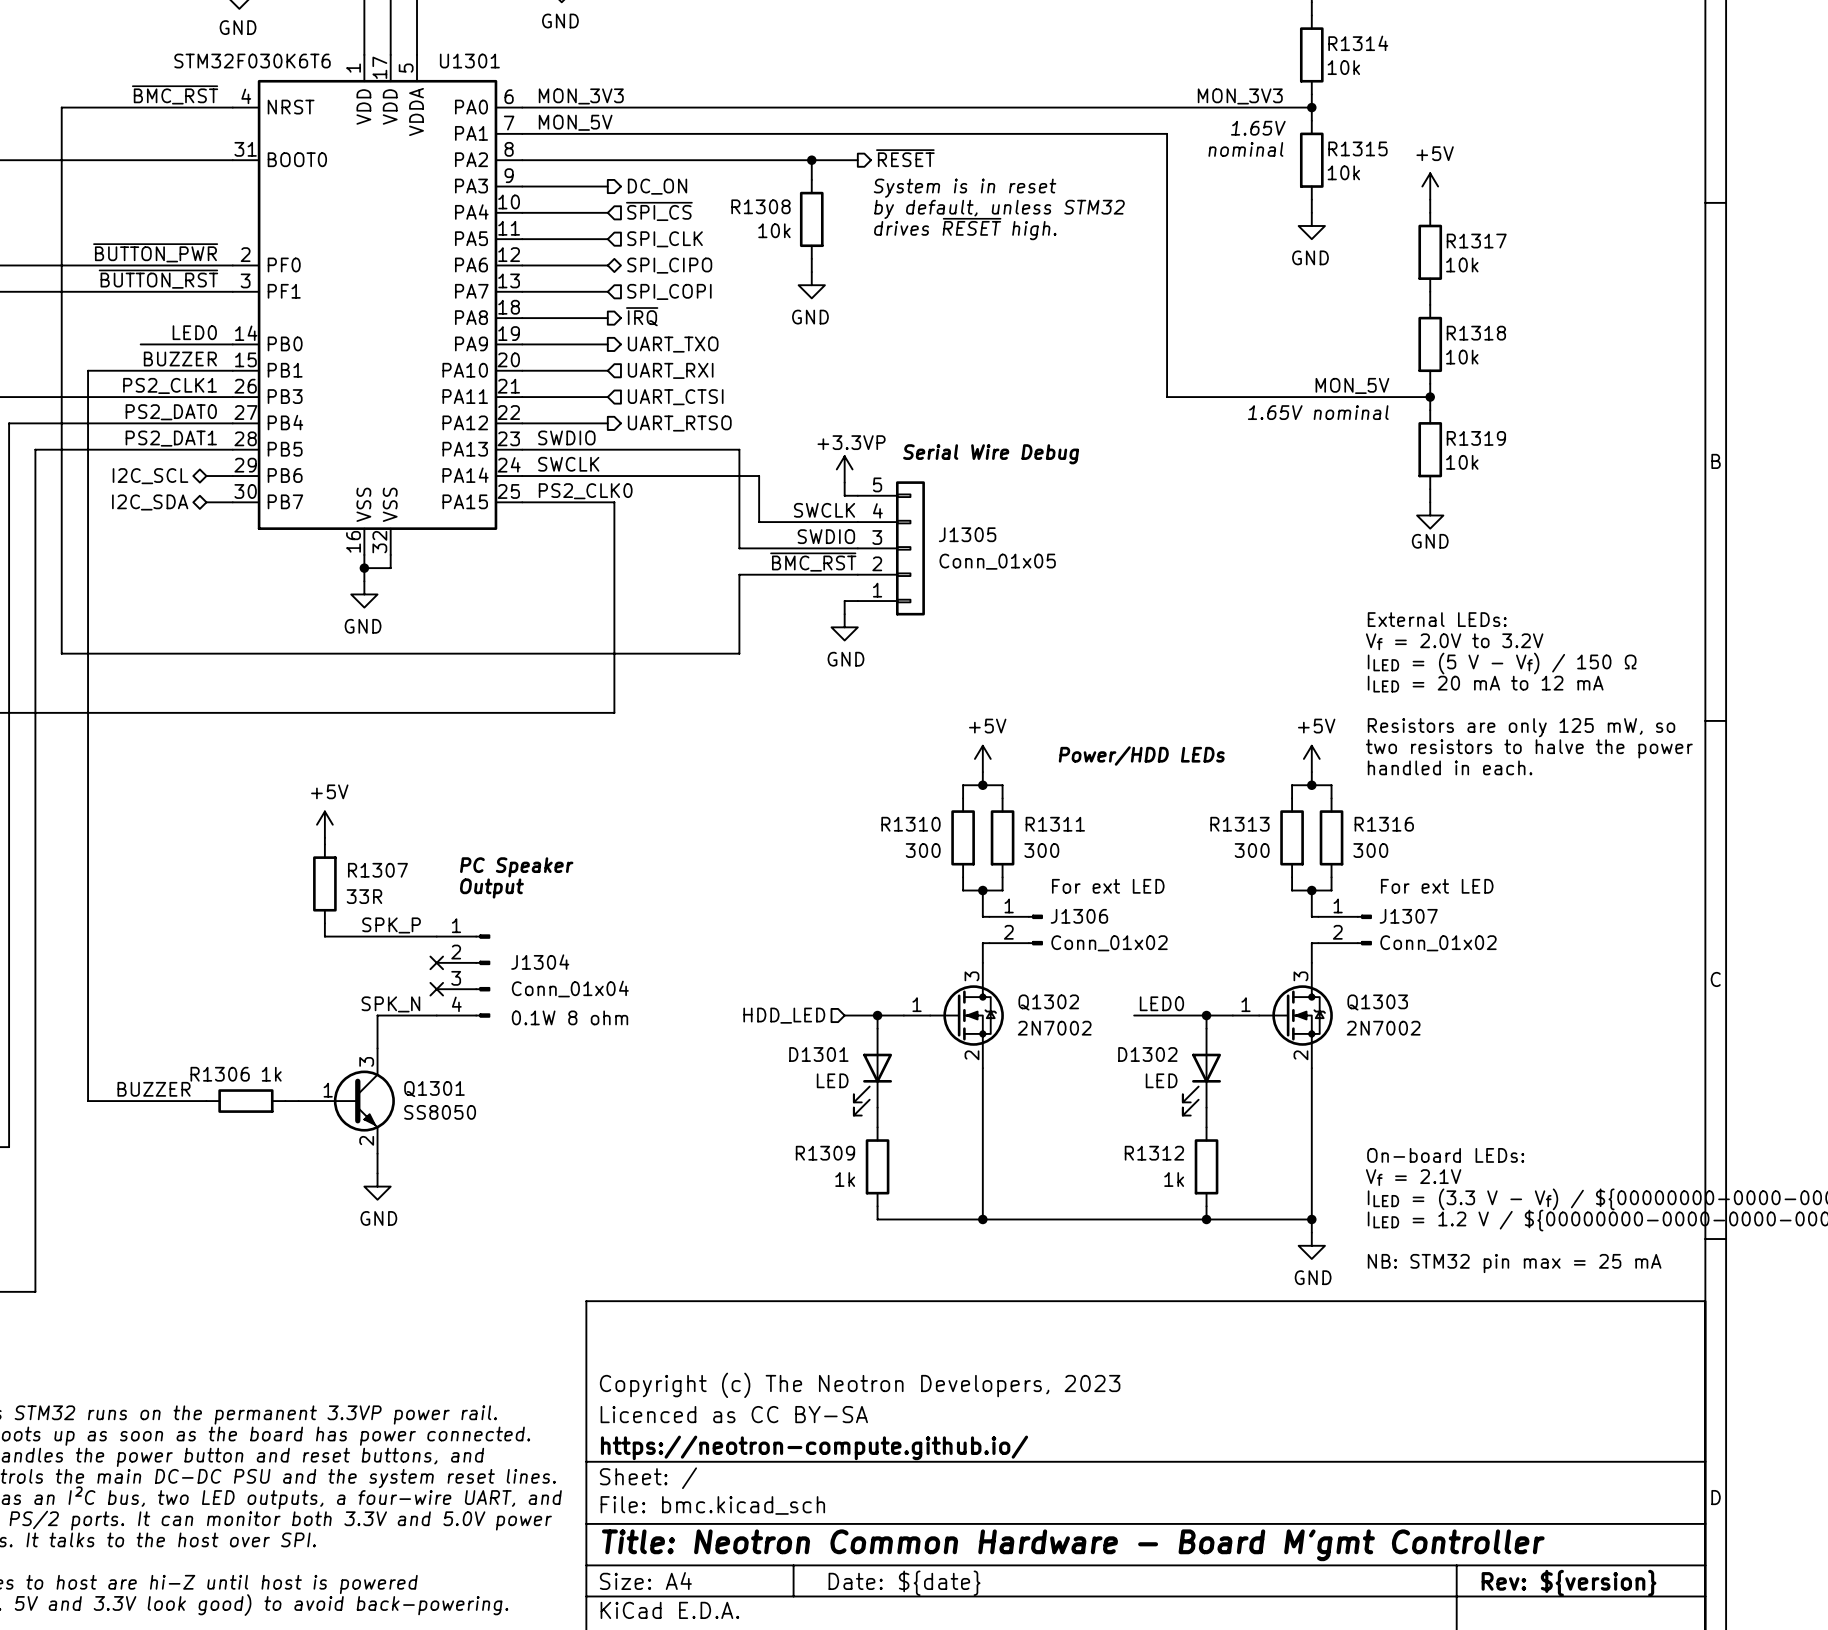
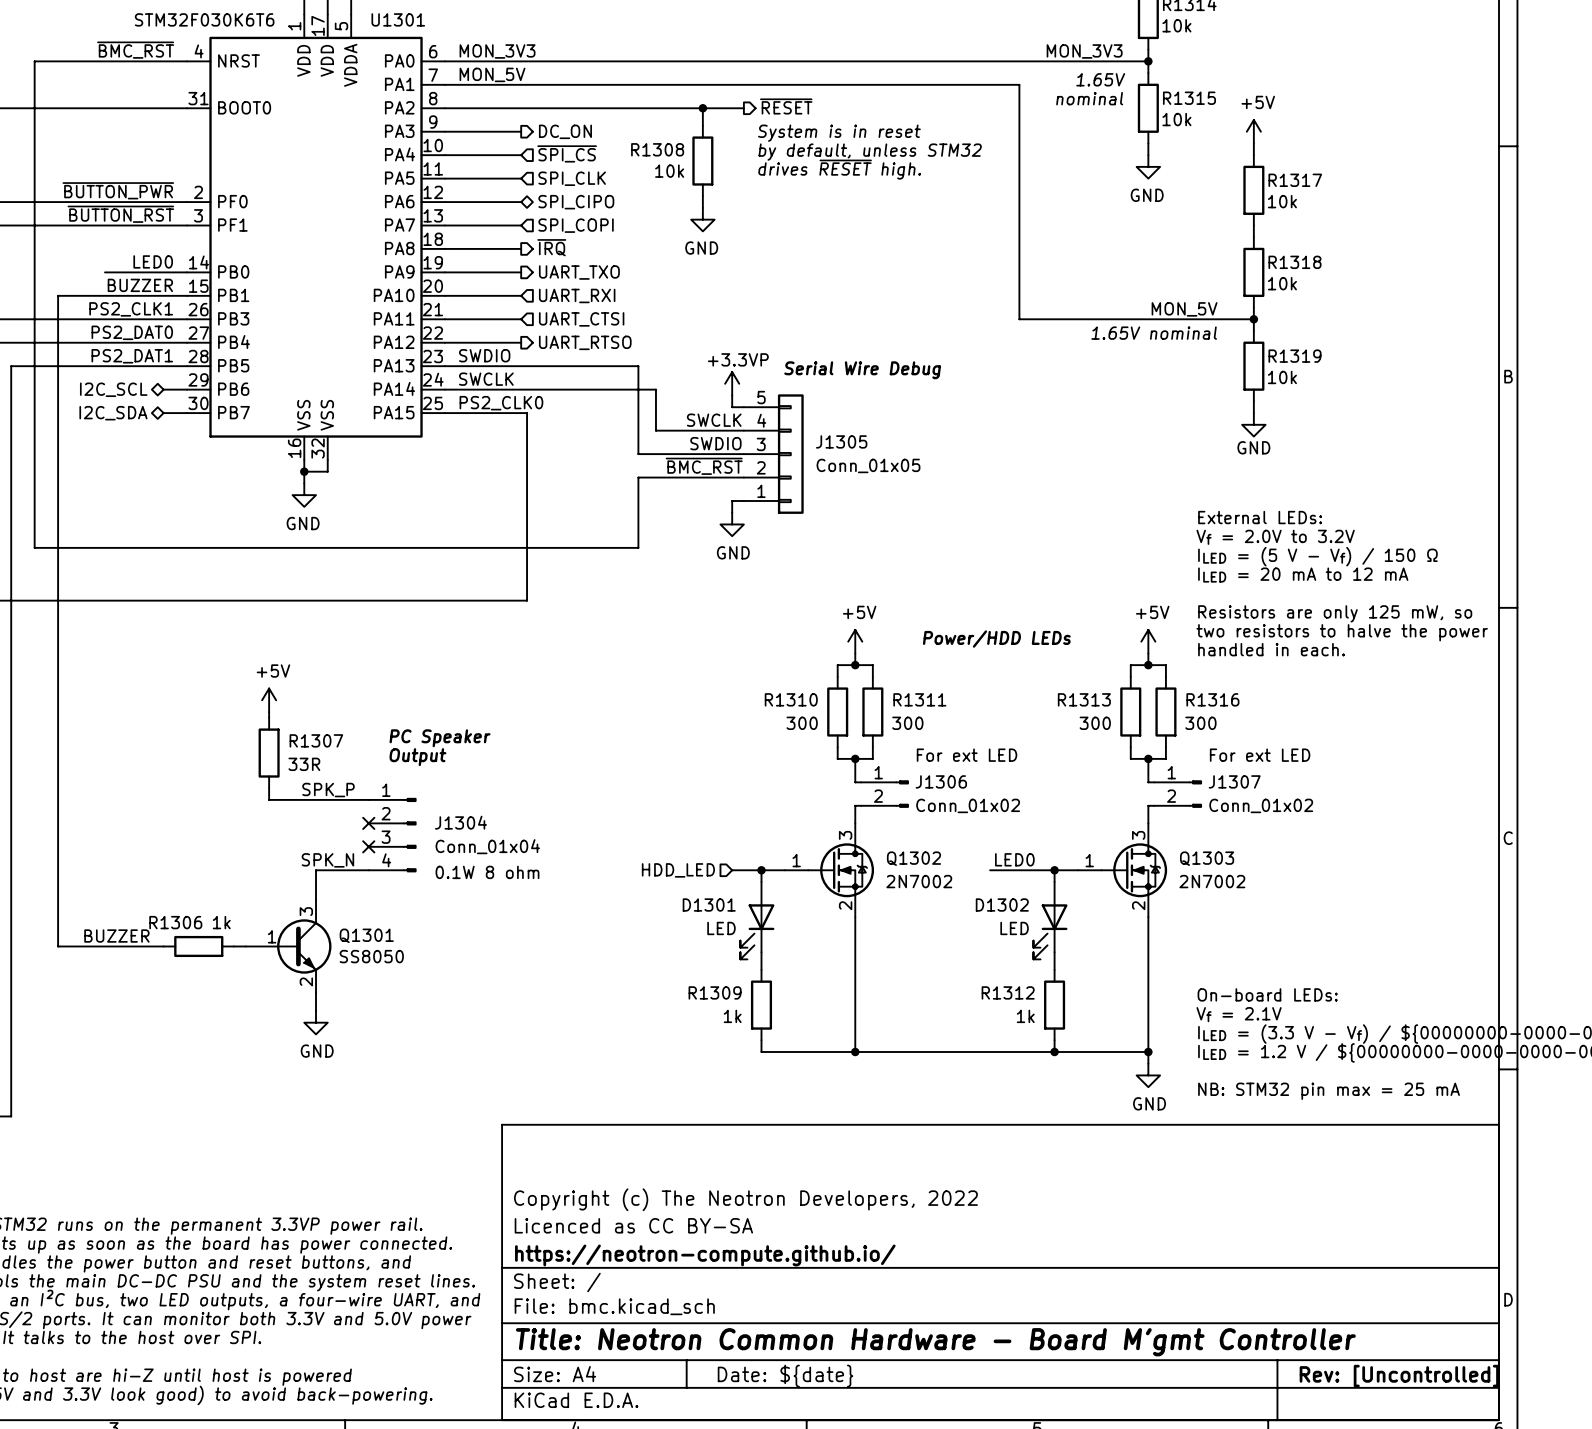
title block: Copyright (c) The Neotron Developers, 2023 (860, 1385) -> Copyright (c) The Neotron Developers, 2022 (745, 1199)
title block: Rev: ${version} (1569, 1583) -> Rev: [Uncontrolled] (1399, 1376)

